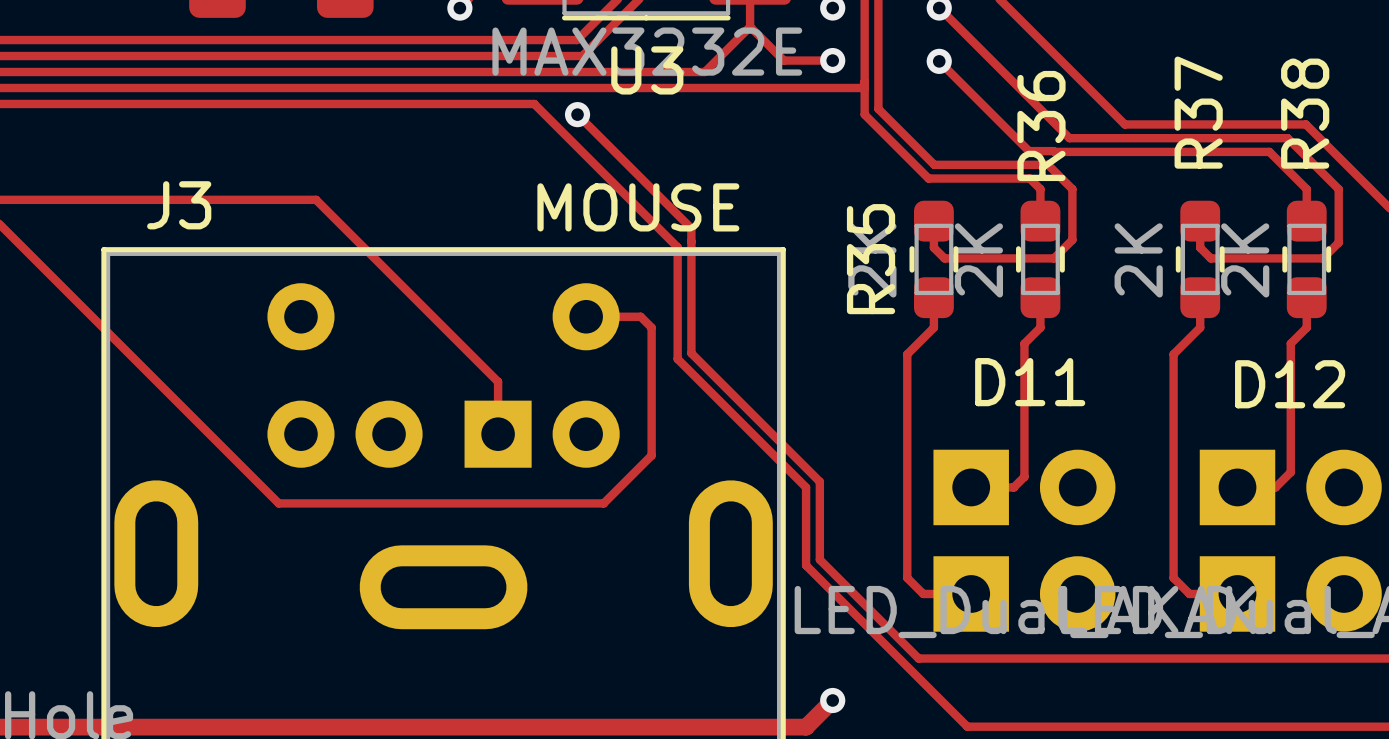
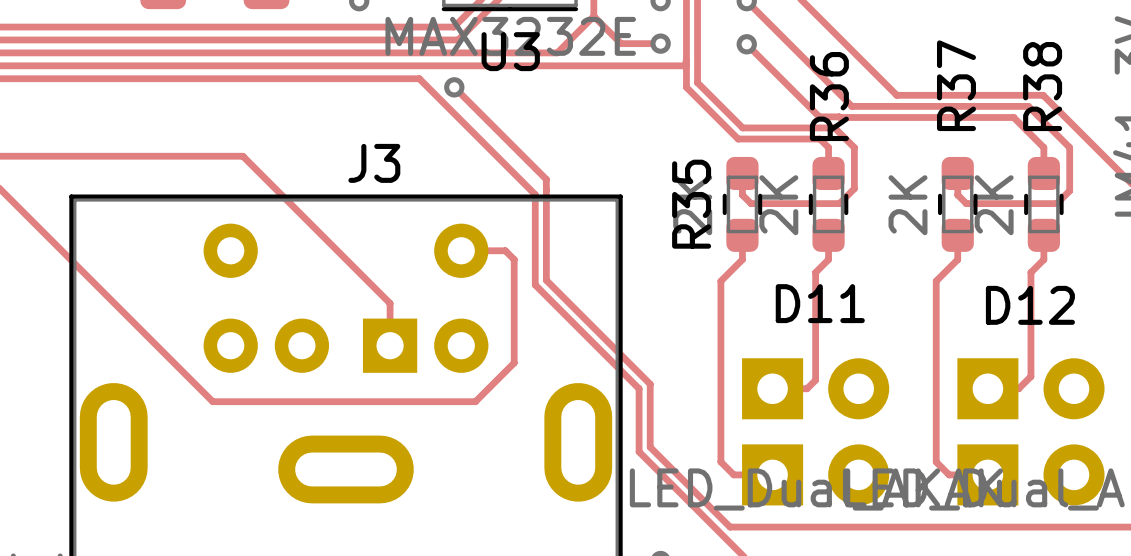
J3 name position: J3 (179, 205) -> J3 (374, 163)
text: MOUSE (638, 207) -> none

